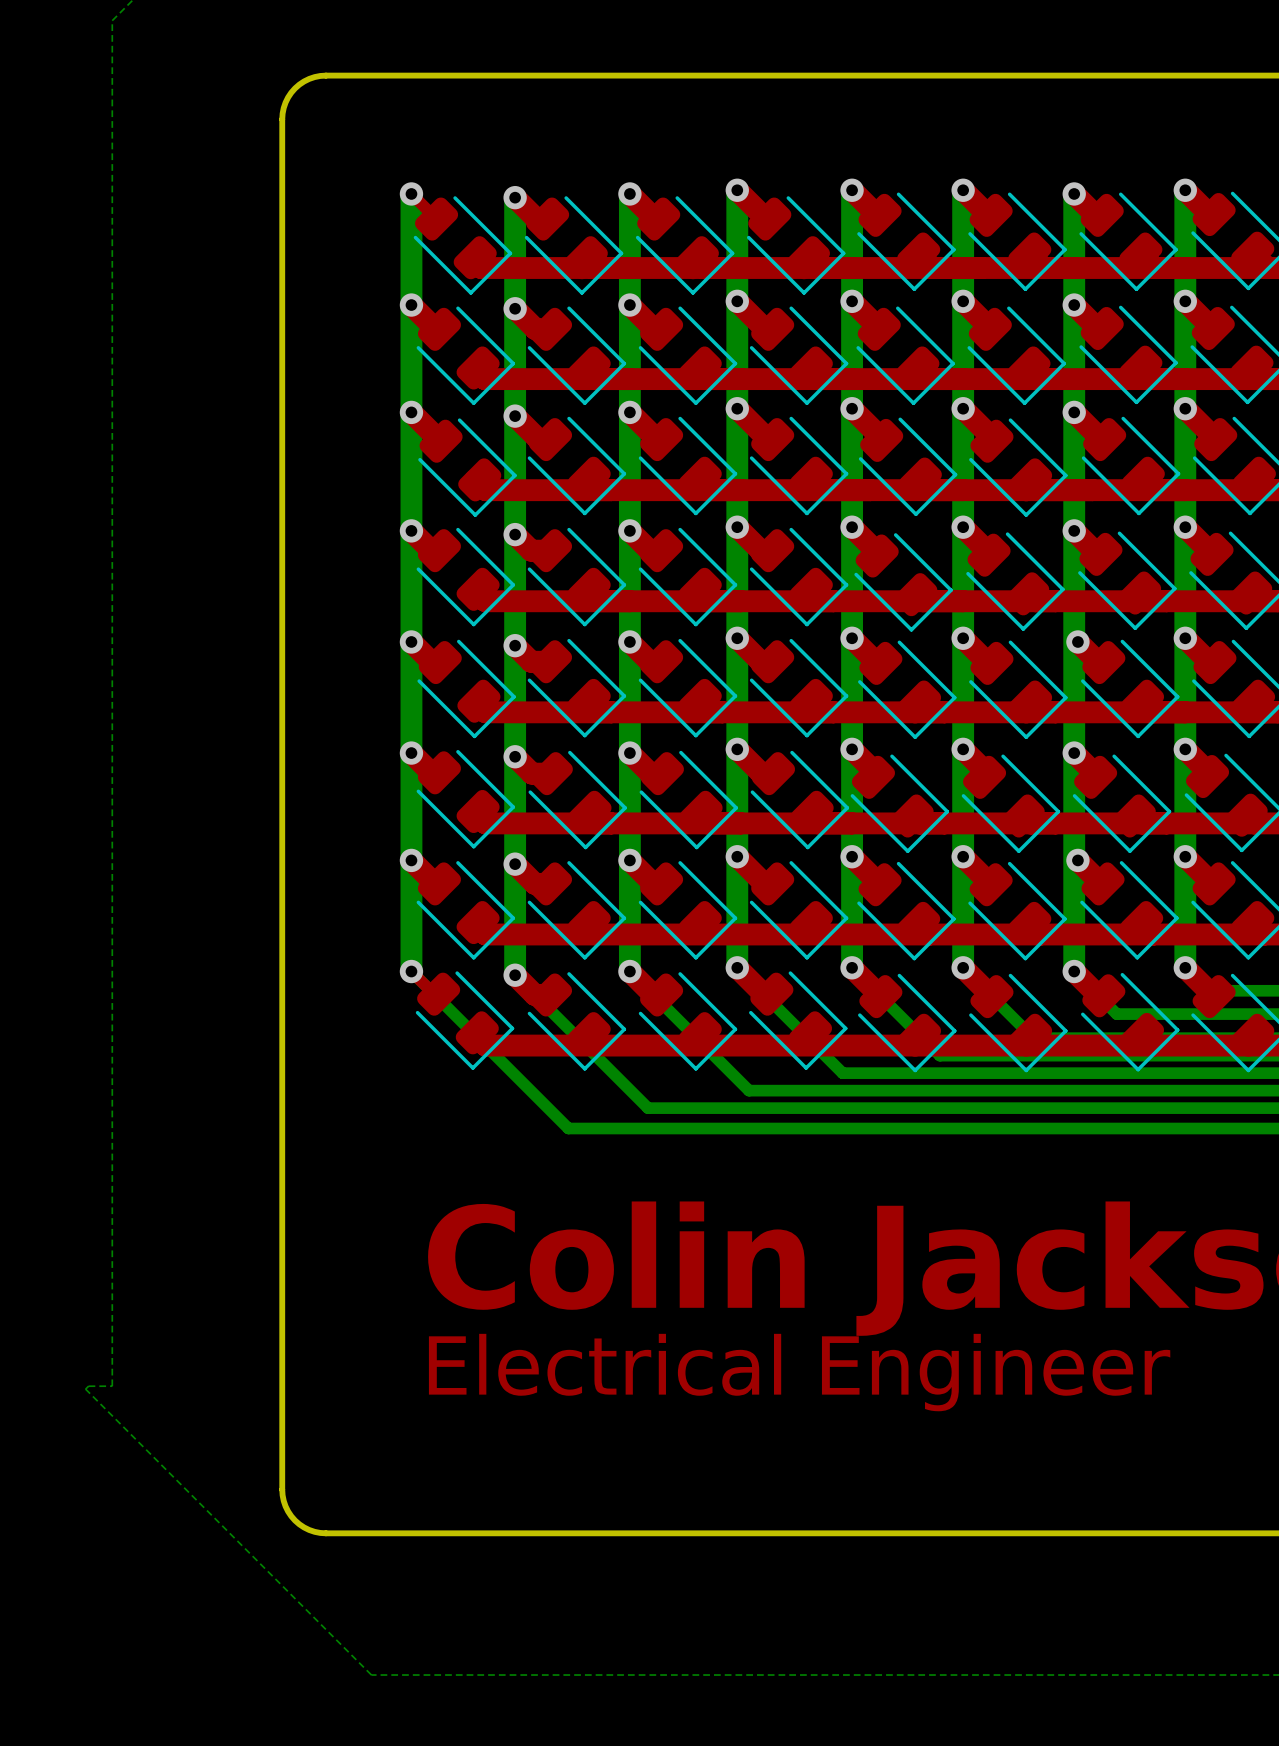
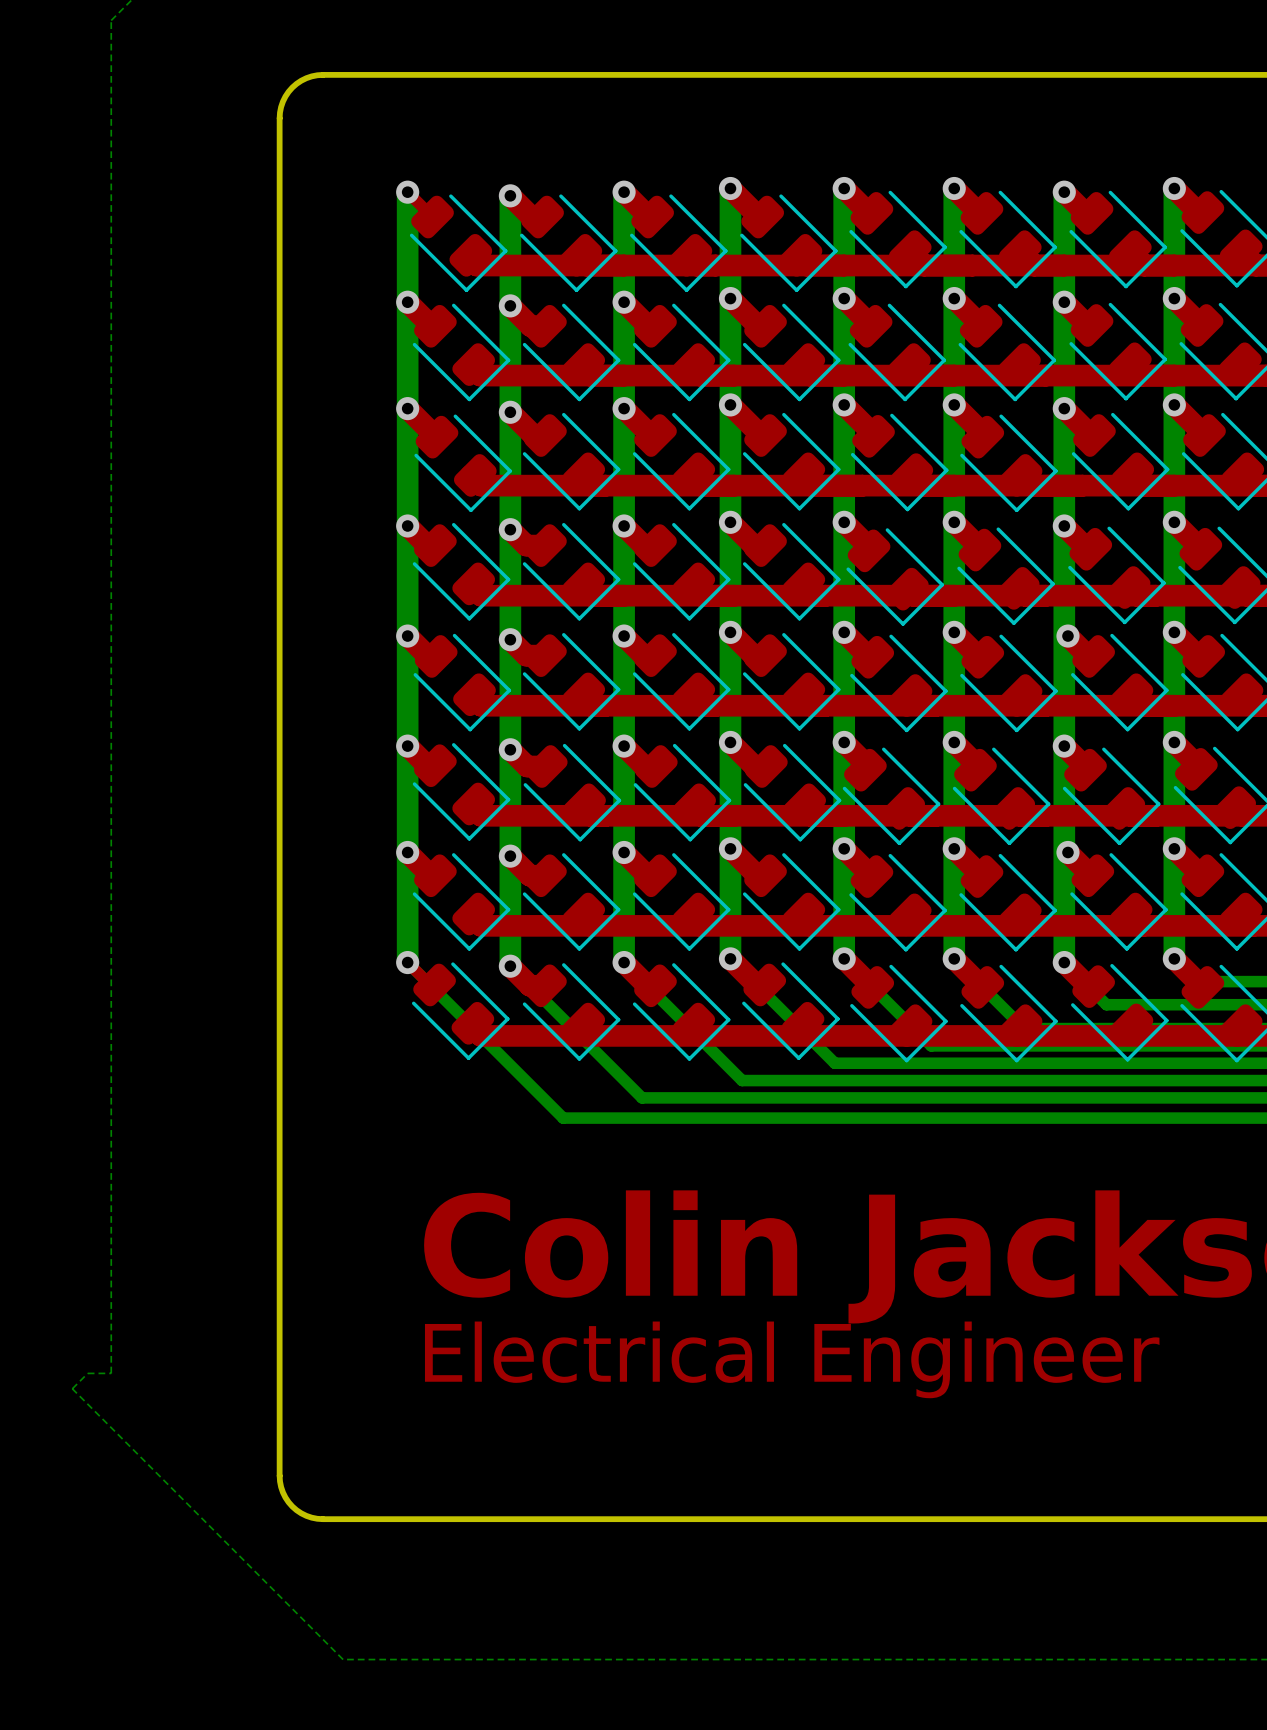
bottom zone outline: (85, 1389) (371, 1675) -> (84, 1376) (72, 1388) (343, 1659) (368, 1659)

